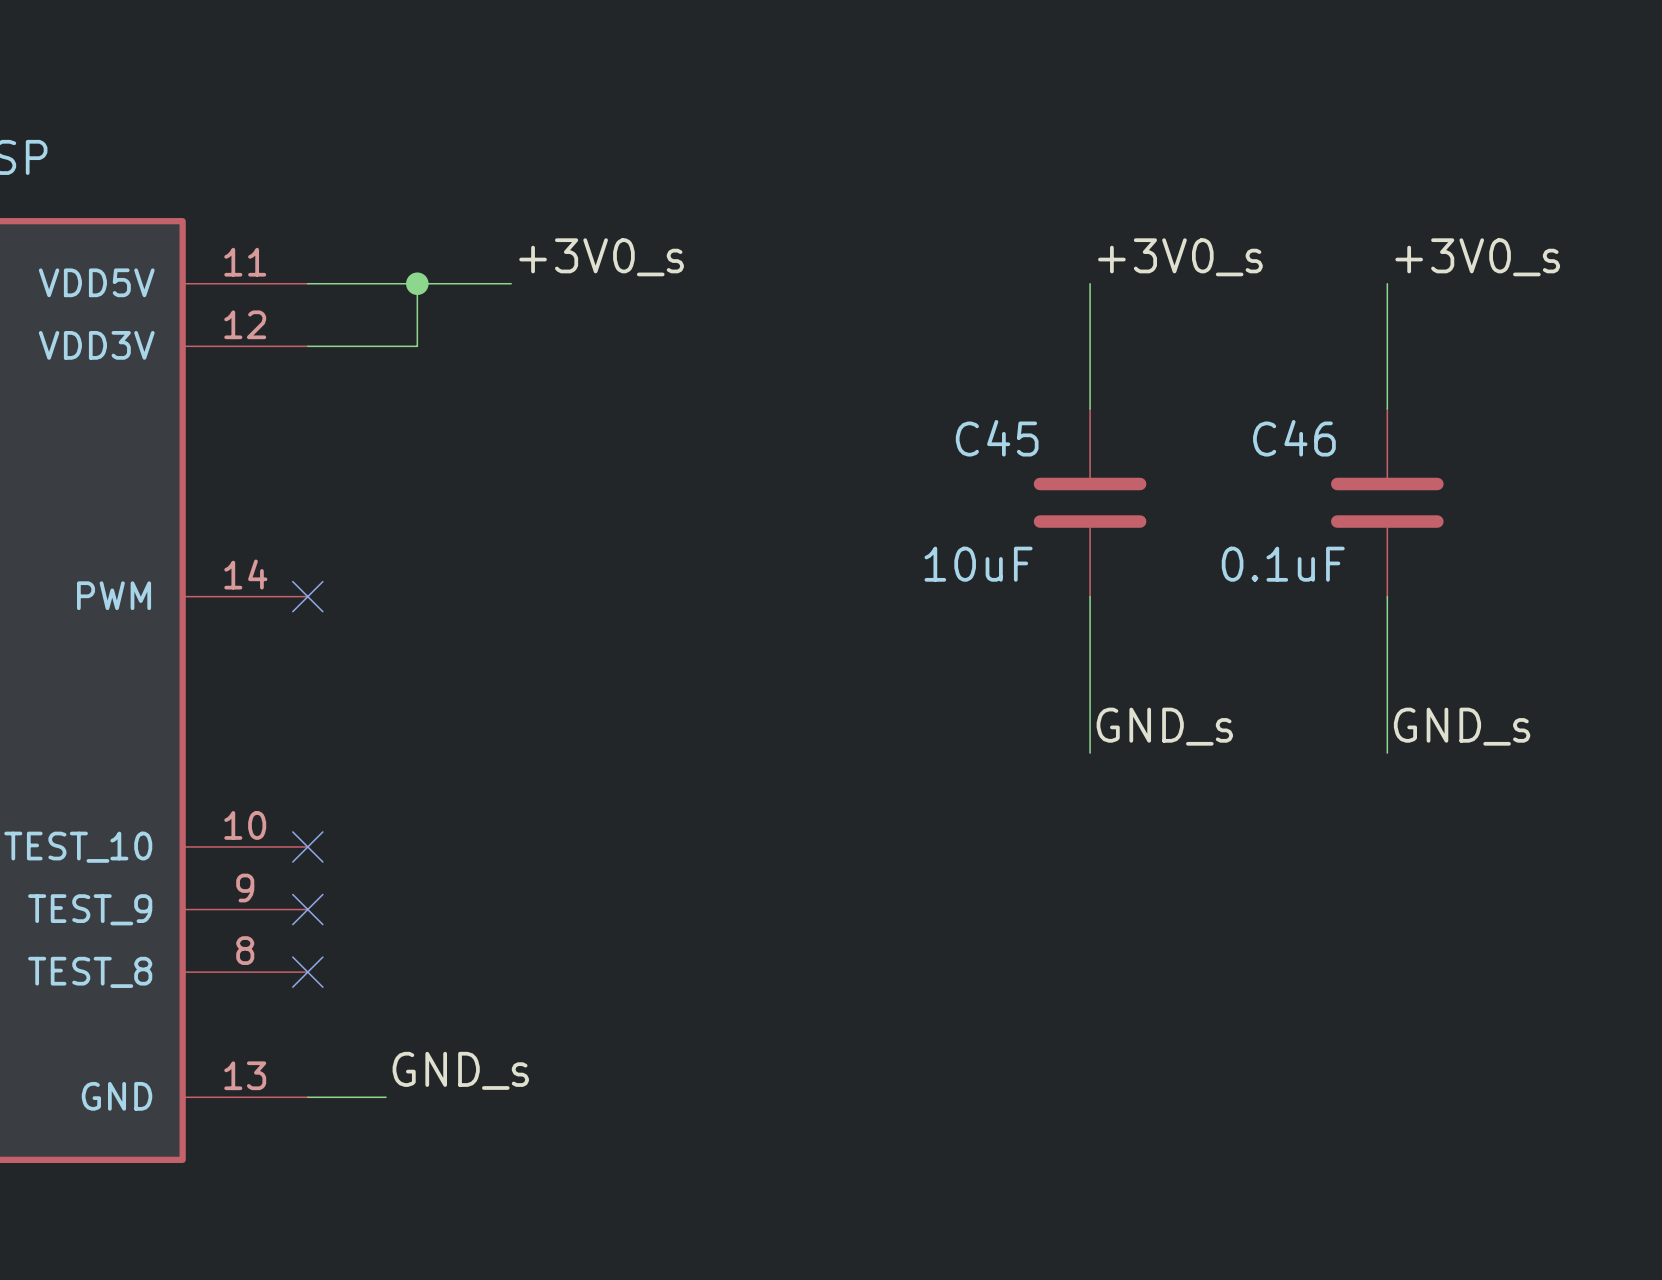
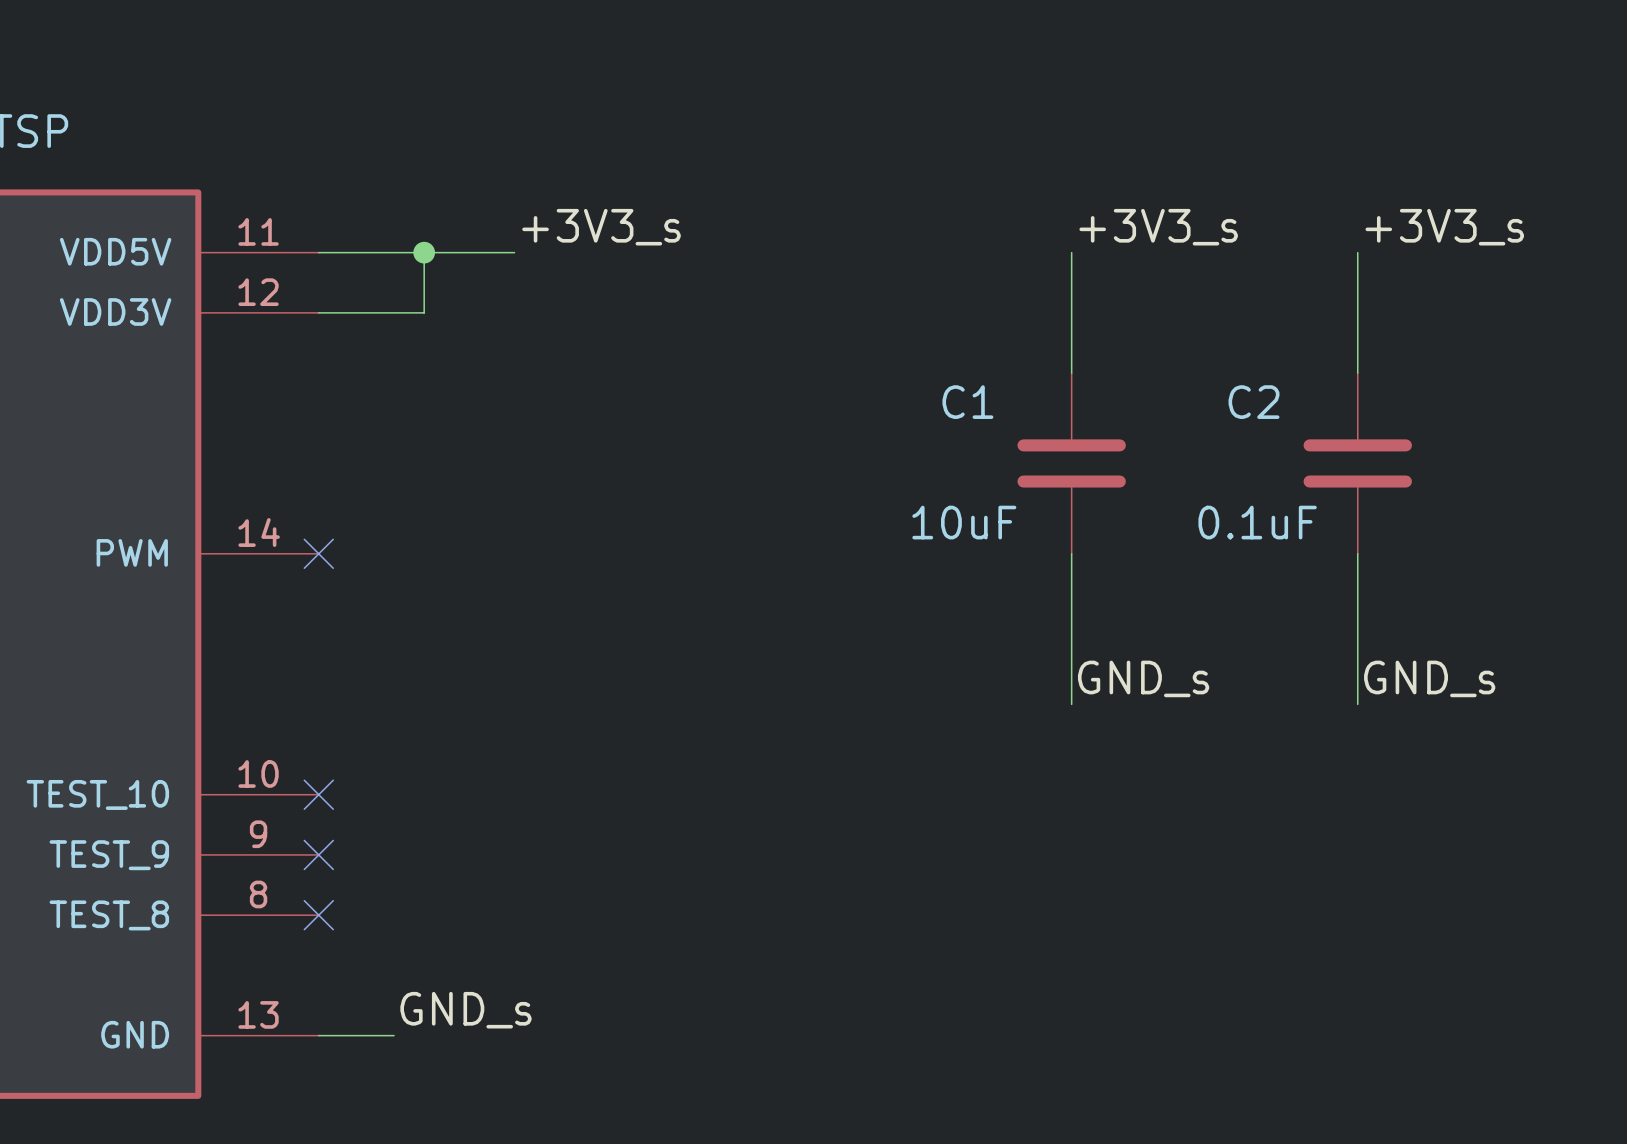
label: +3V0_s (601, 257) -> +3V3_s (601, 227)
label: +3V0_s (1180, 257) -> +3V3_s (1158, 227)
label: +3V0_s (1477, 257) -> +3V3_s (1444, 227)
C45 name: C45 (997, 438) -> C1 (967, 402)
C46 name: C46 (1294, 438) -> C2 (1254, 402)

